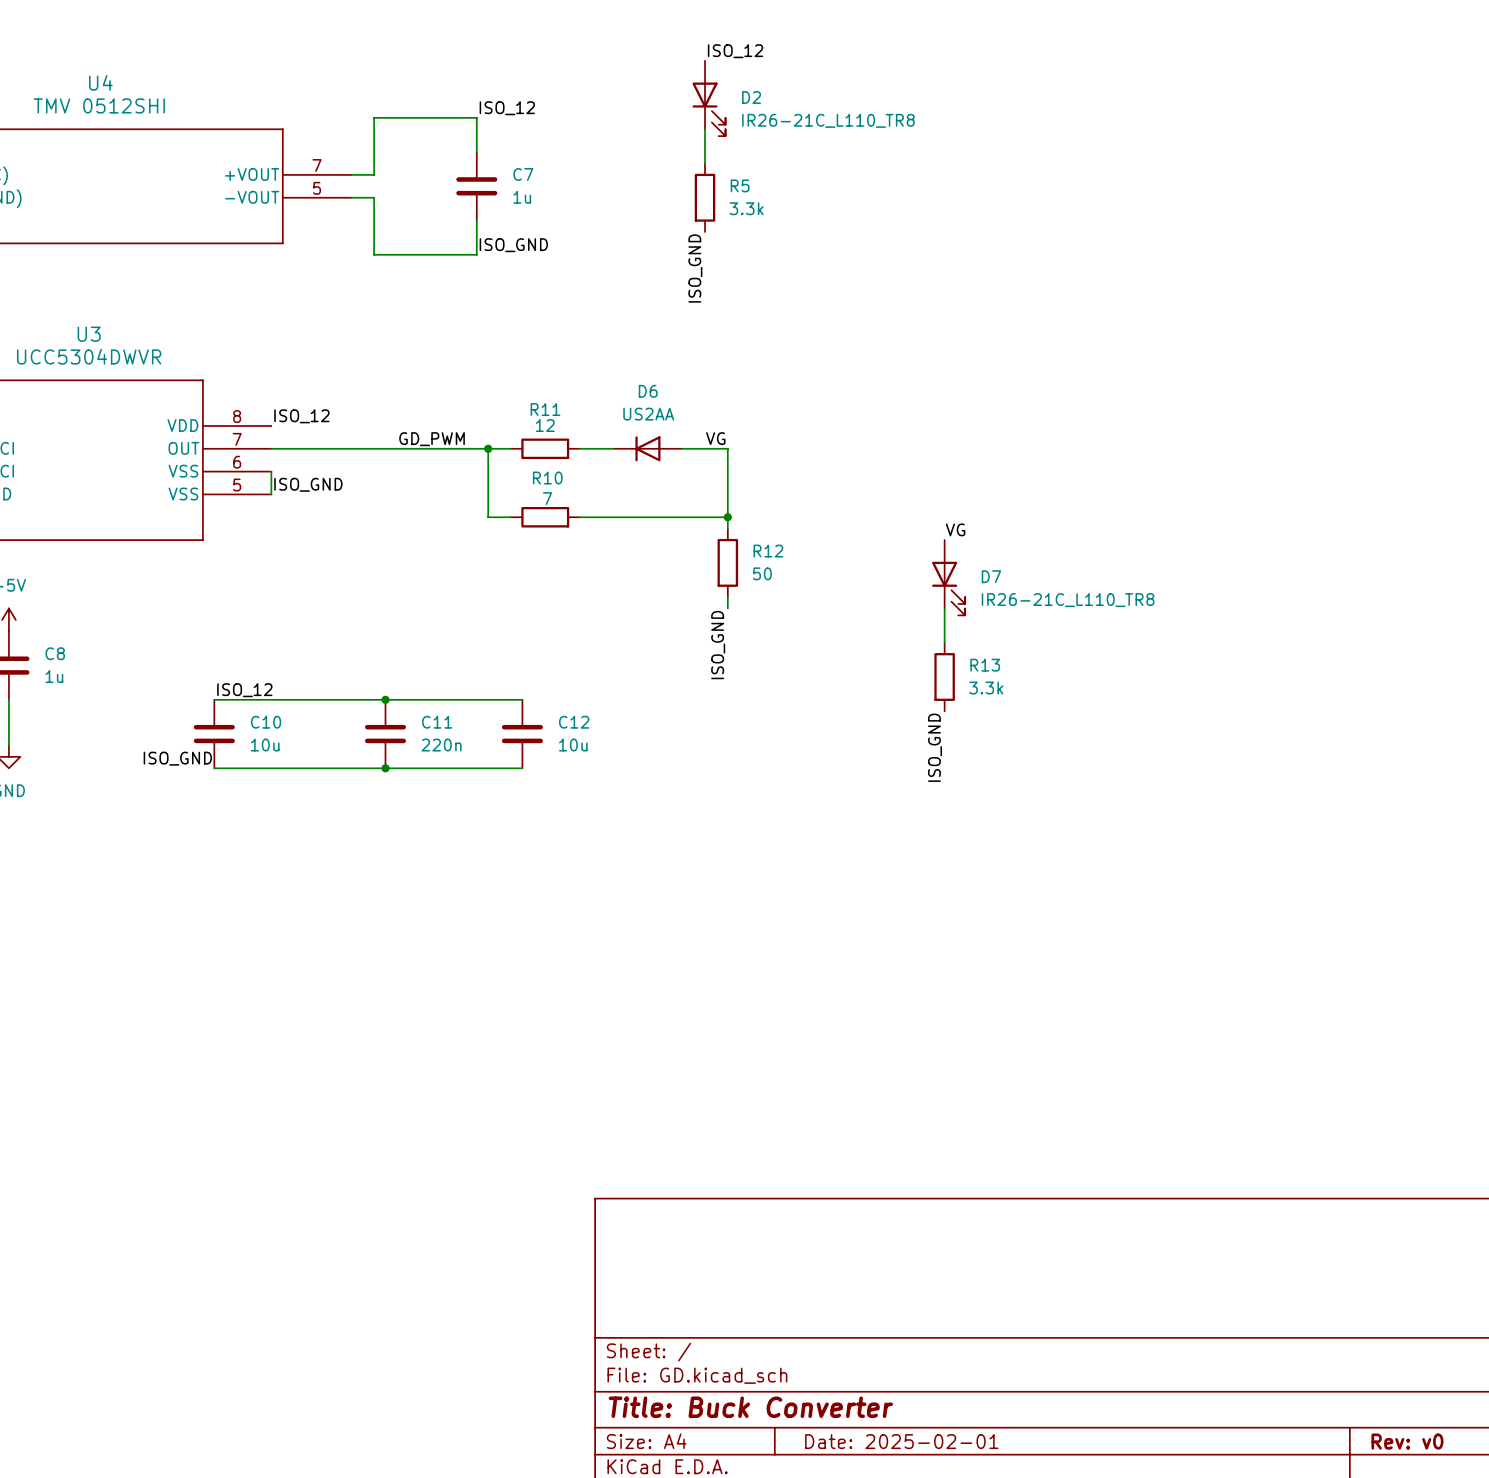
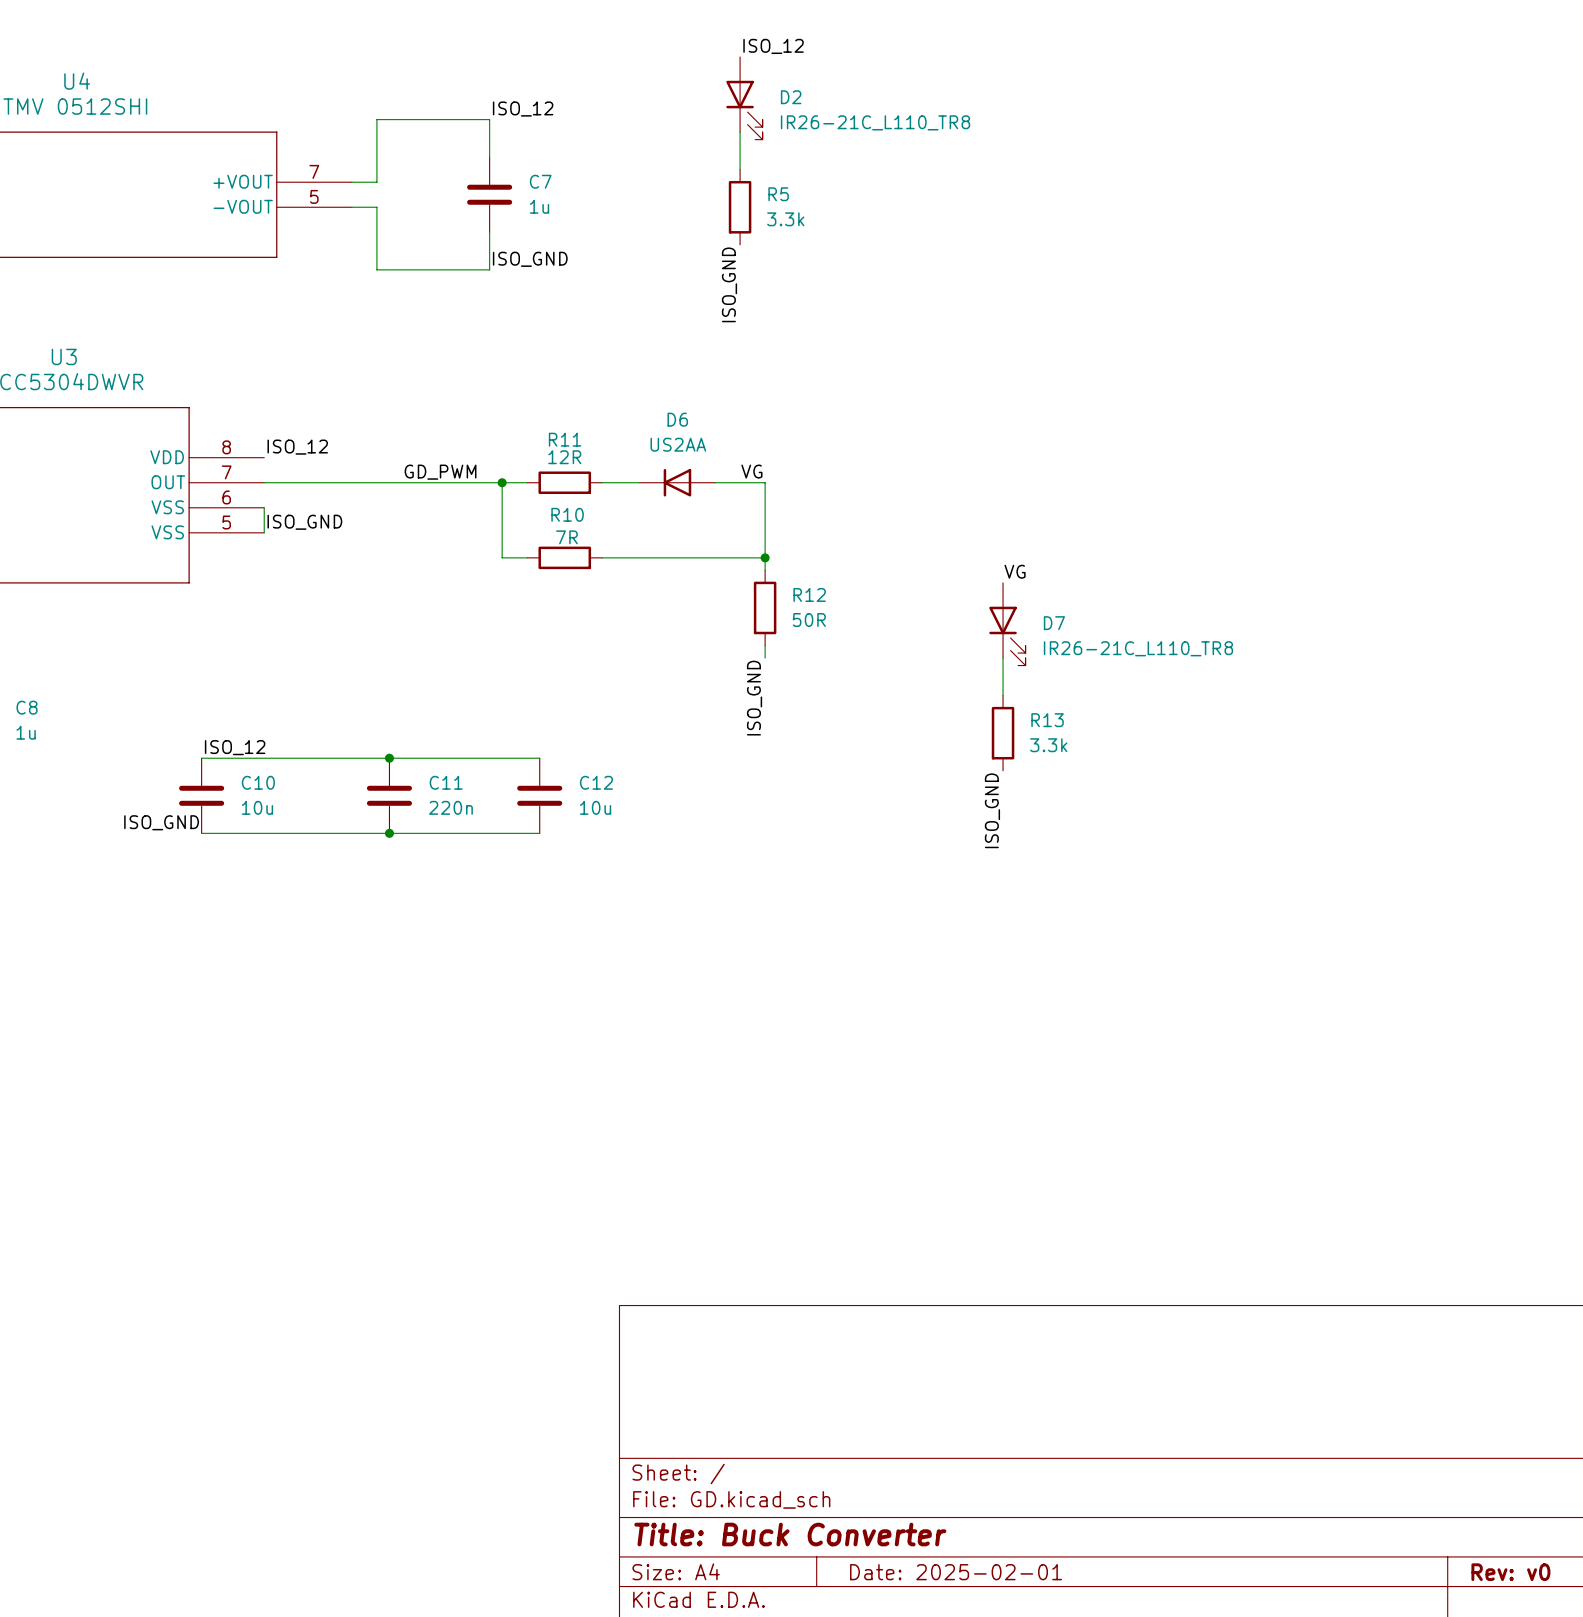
R11 value: 12 (545, 425) -> 12R (564, 457)
R10 value: 7 (547, 498) -> 7R (566, 537)
R12 value: 50 (762, 573) -> 50R (809, 620)

